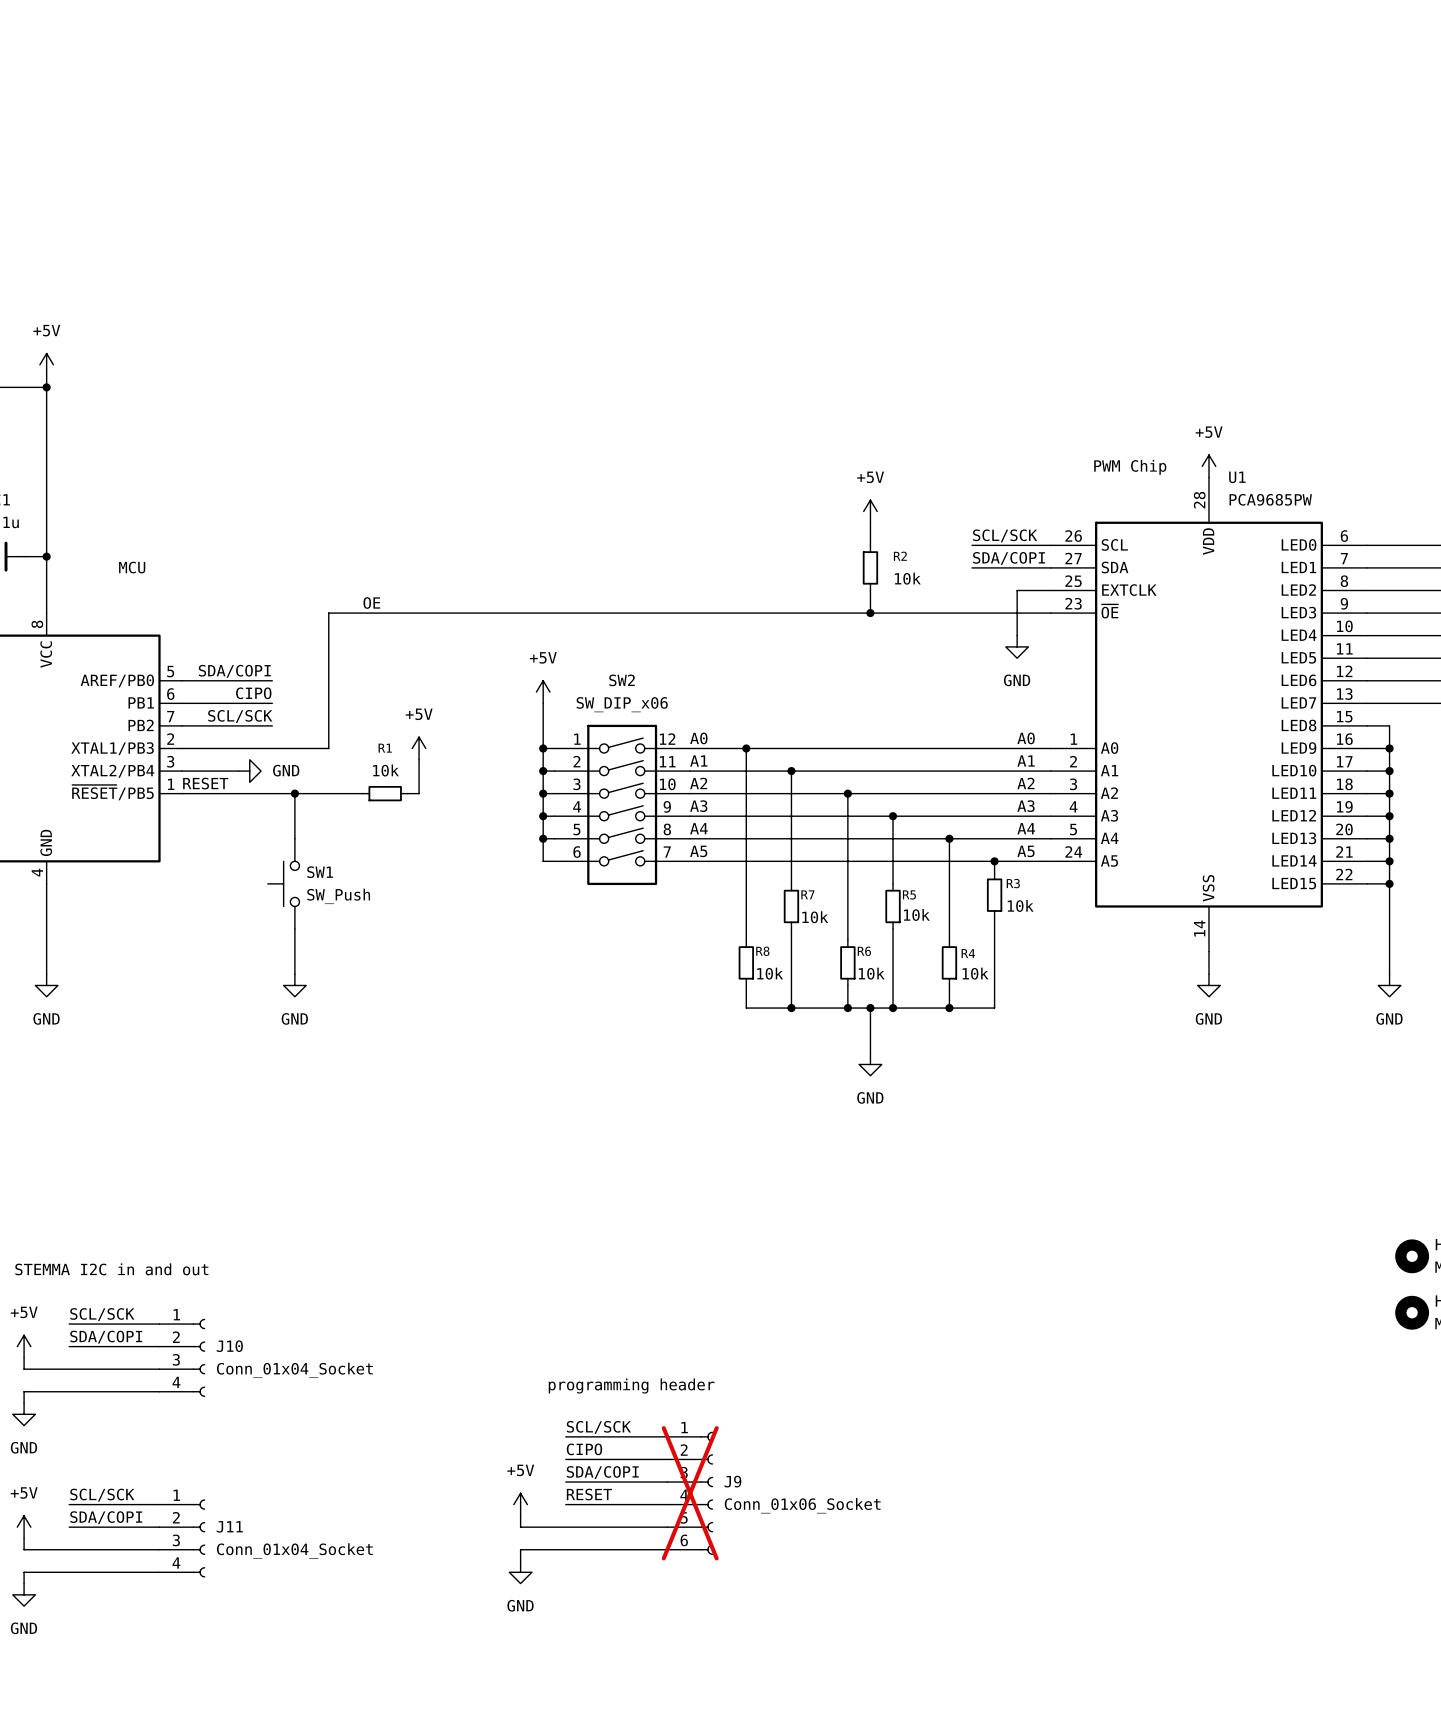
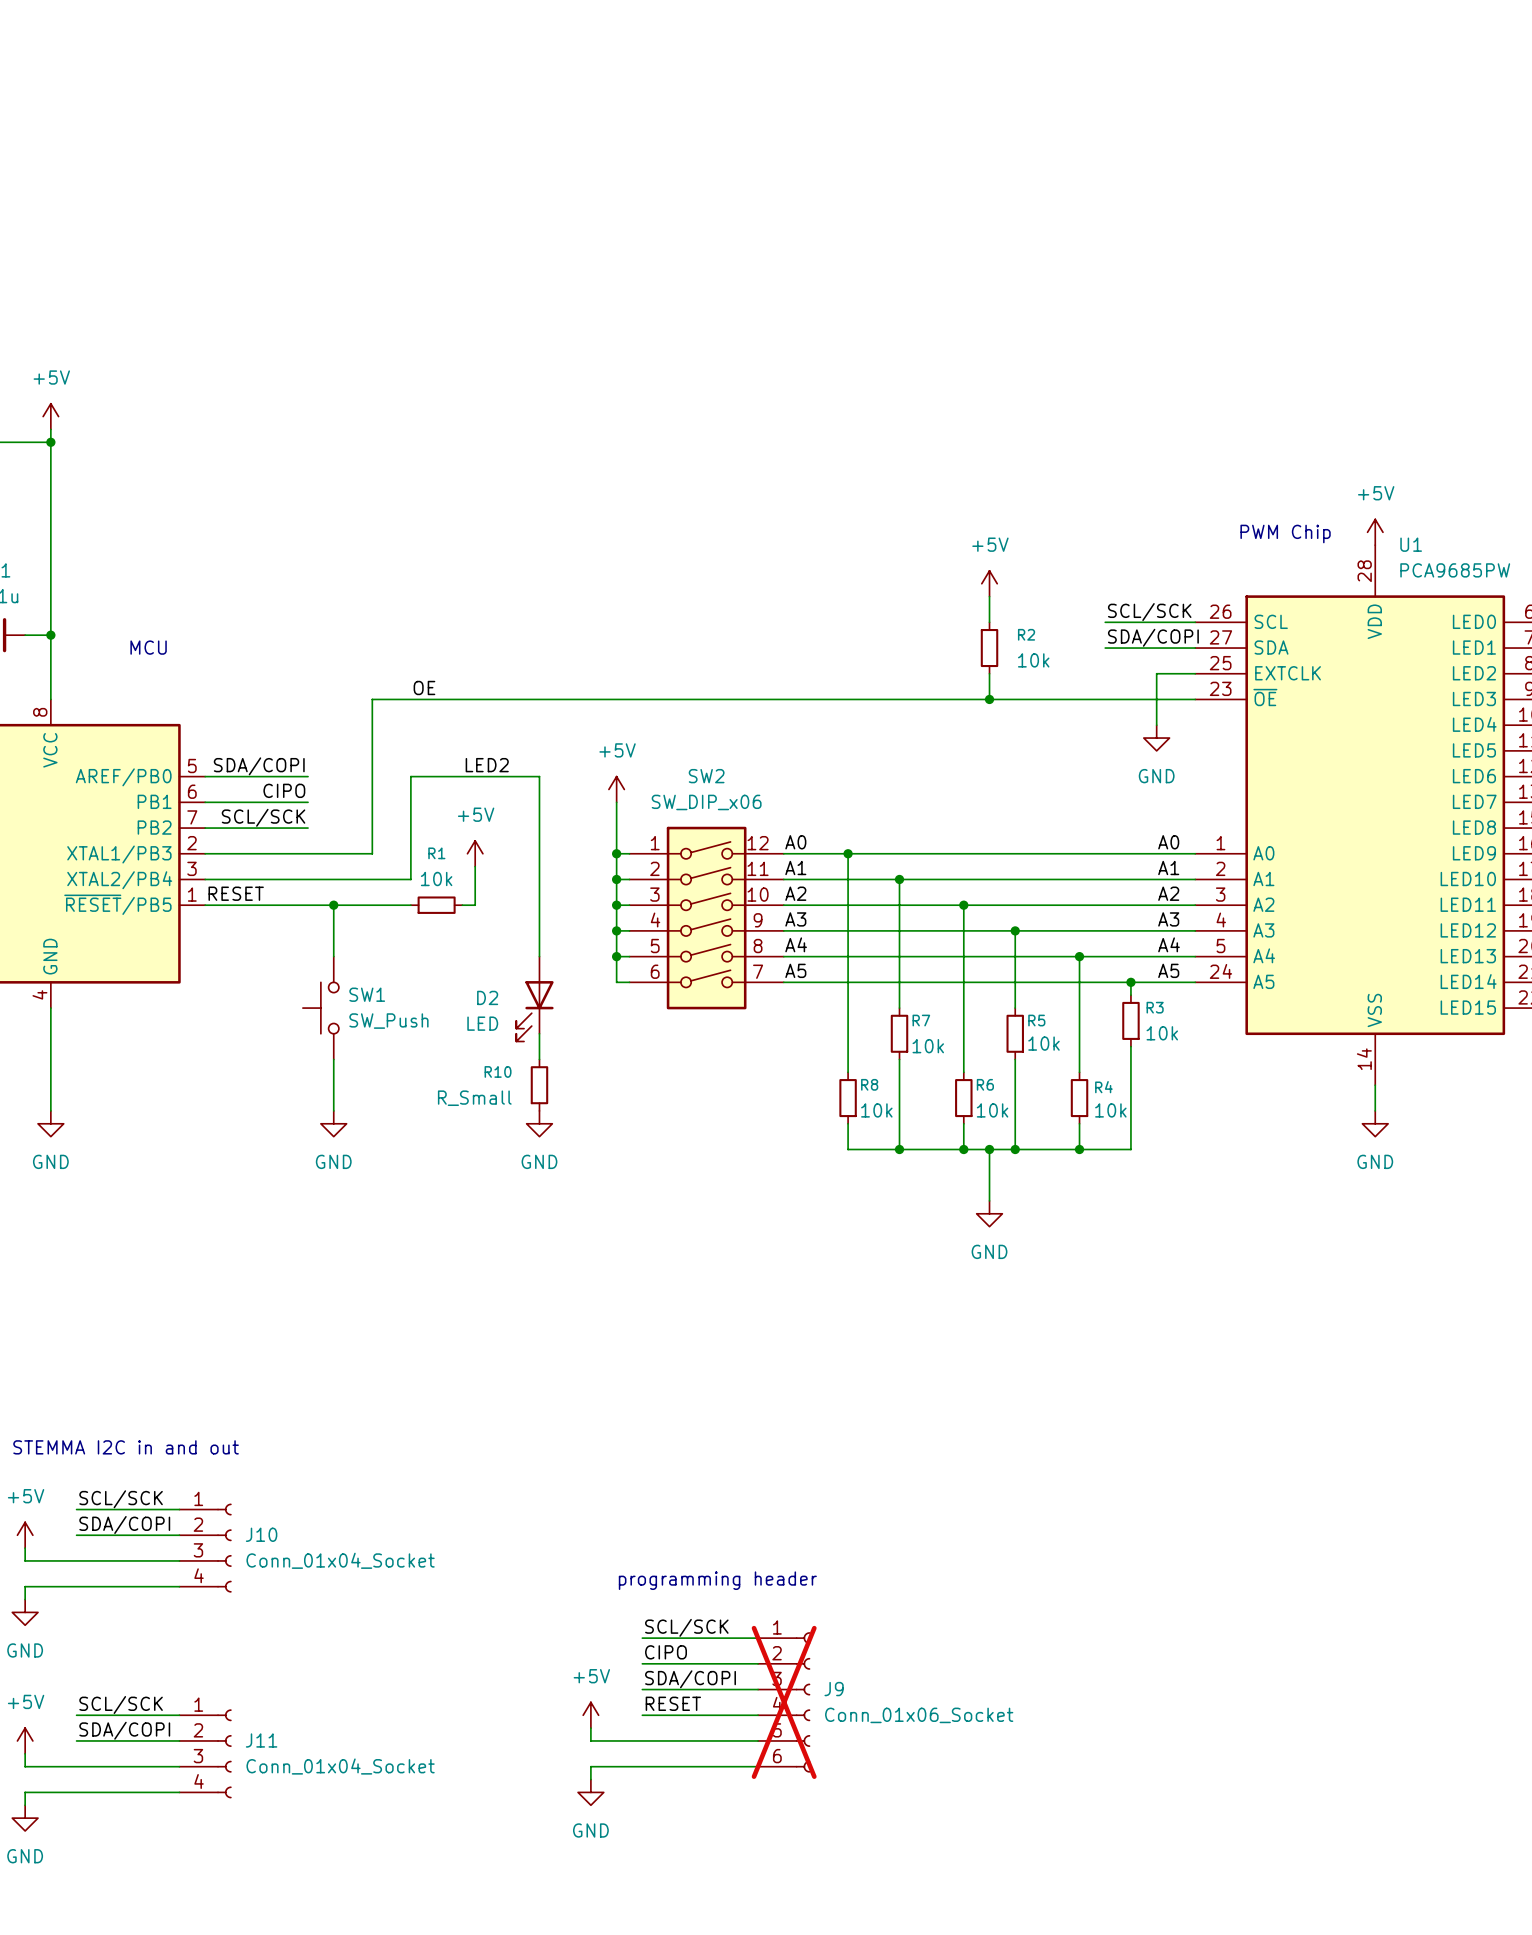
label: none -> LED2 (487, 765)
wire: none -> (269, 879) (410, 879) (410, 776) (539, 776) (539, 956)
power symbol: GND (249, 771) -> none
D2: none -> LED (534, 999)
wire: none -> (539, 1033) (539, 1059)
R10: none -> R_Small (539, 1085)
power symbol: none -> GND (539, 1123)

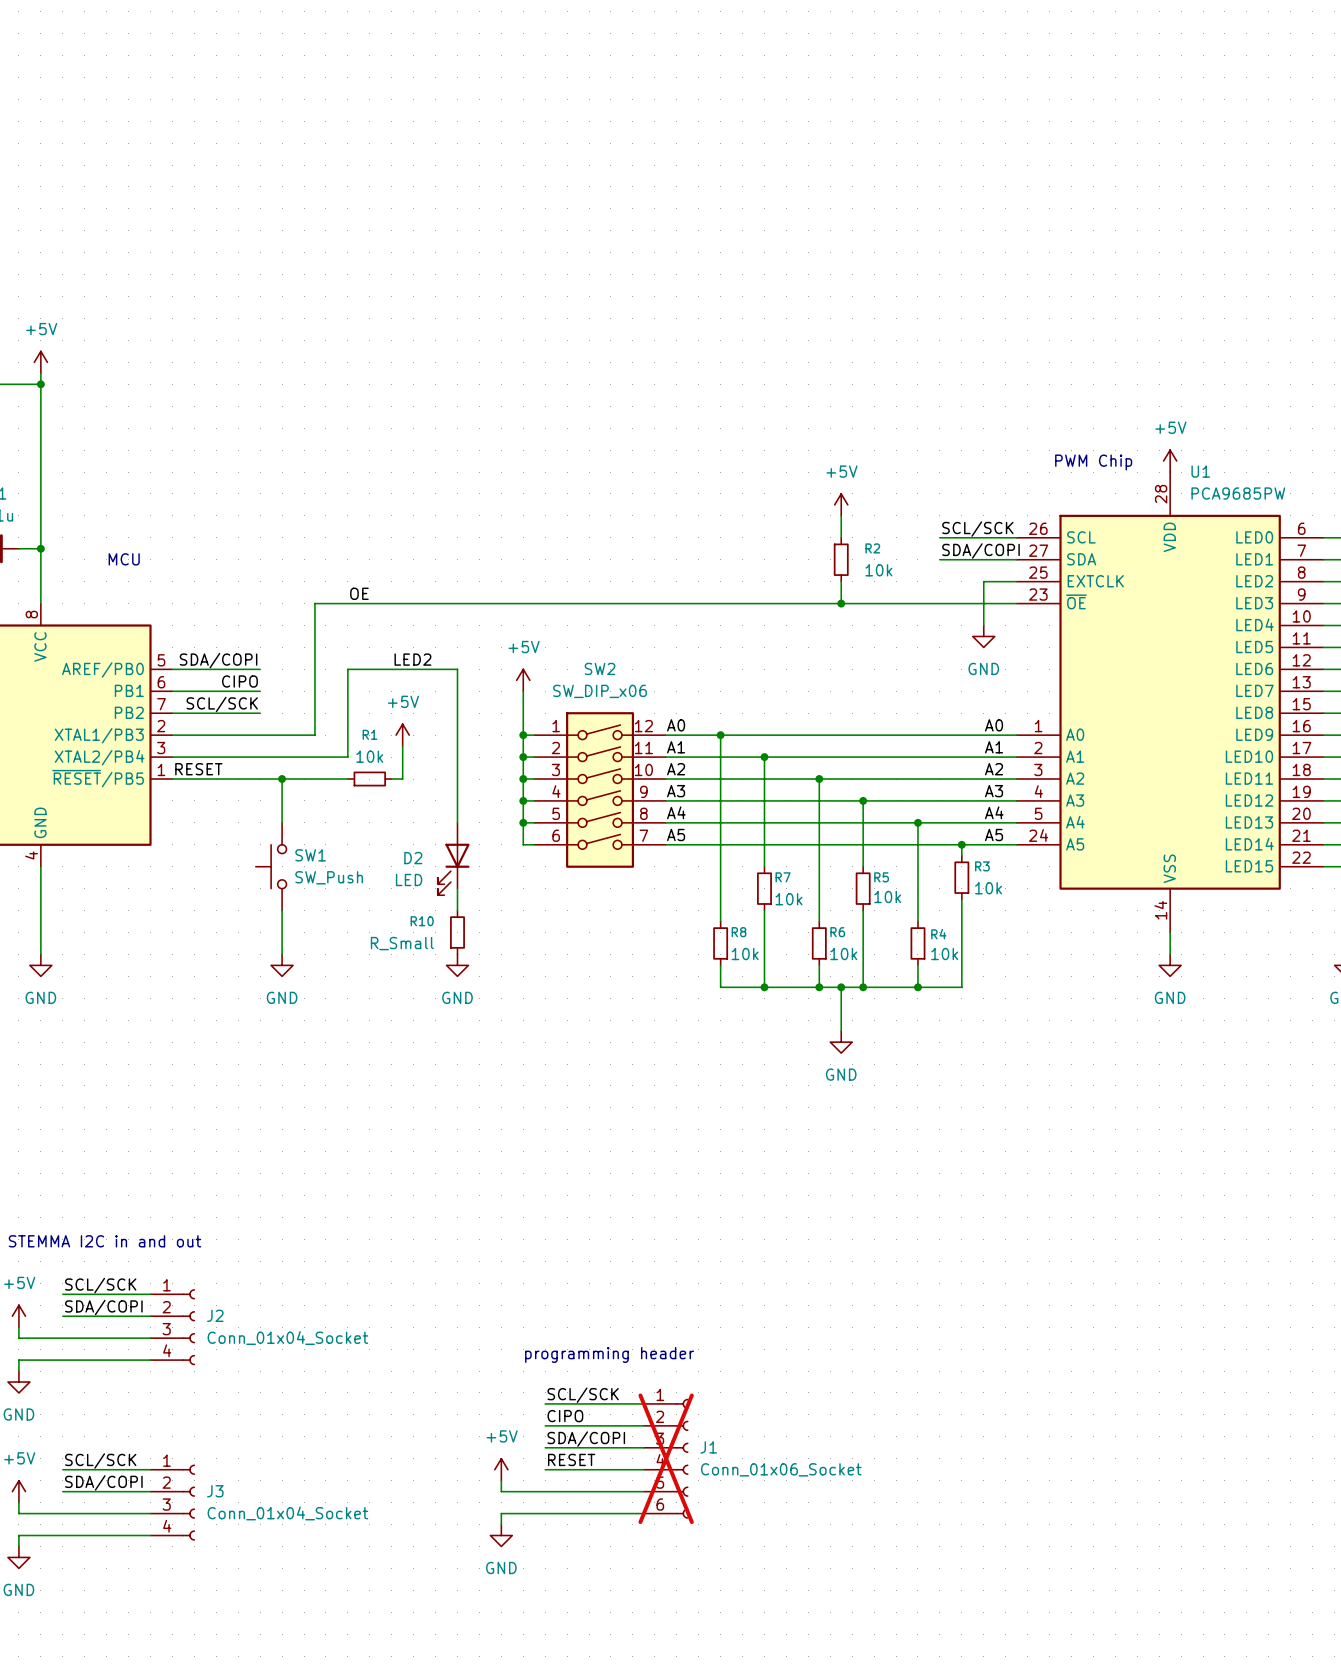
J10 name: J10 (261, 1534) -> J2 (215, 1315)
J9 name: J9 (834, 1689) -> J1 (708, 1447)
J11 name: J11 (261, 1740) -> J3 (215, 1491)

